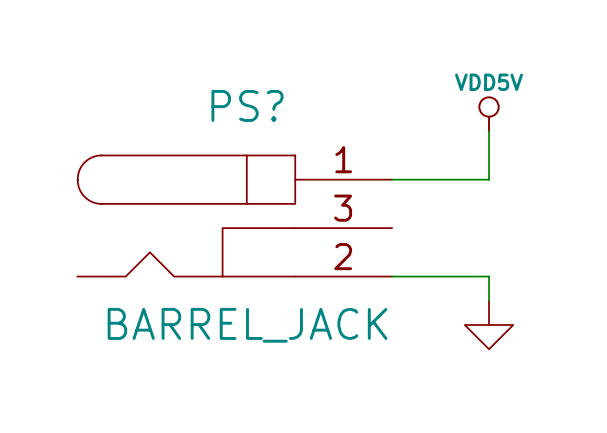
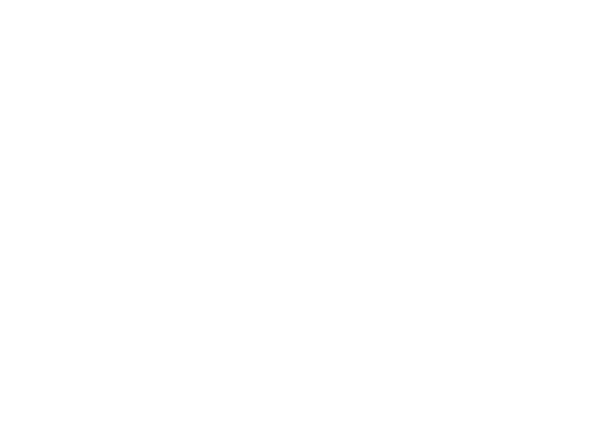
power symbol: VDD5V (489, 114) -> none
wire: (489, 131) (489, 179) (392, 179) -> none
PS?: BARREL_JACK (234, 216) -> none
wire: (392, 276) (489, 276) (489, 300) -> none
power symbol: (489, 325) -> none

